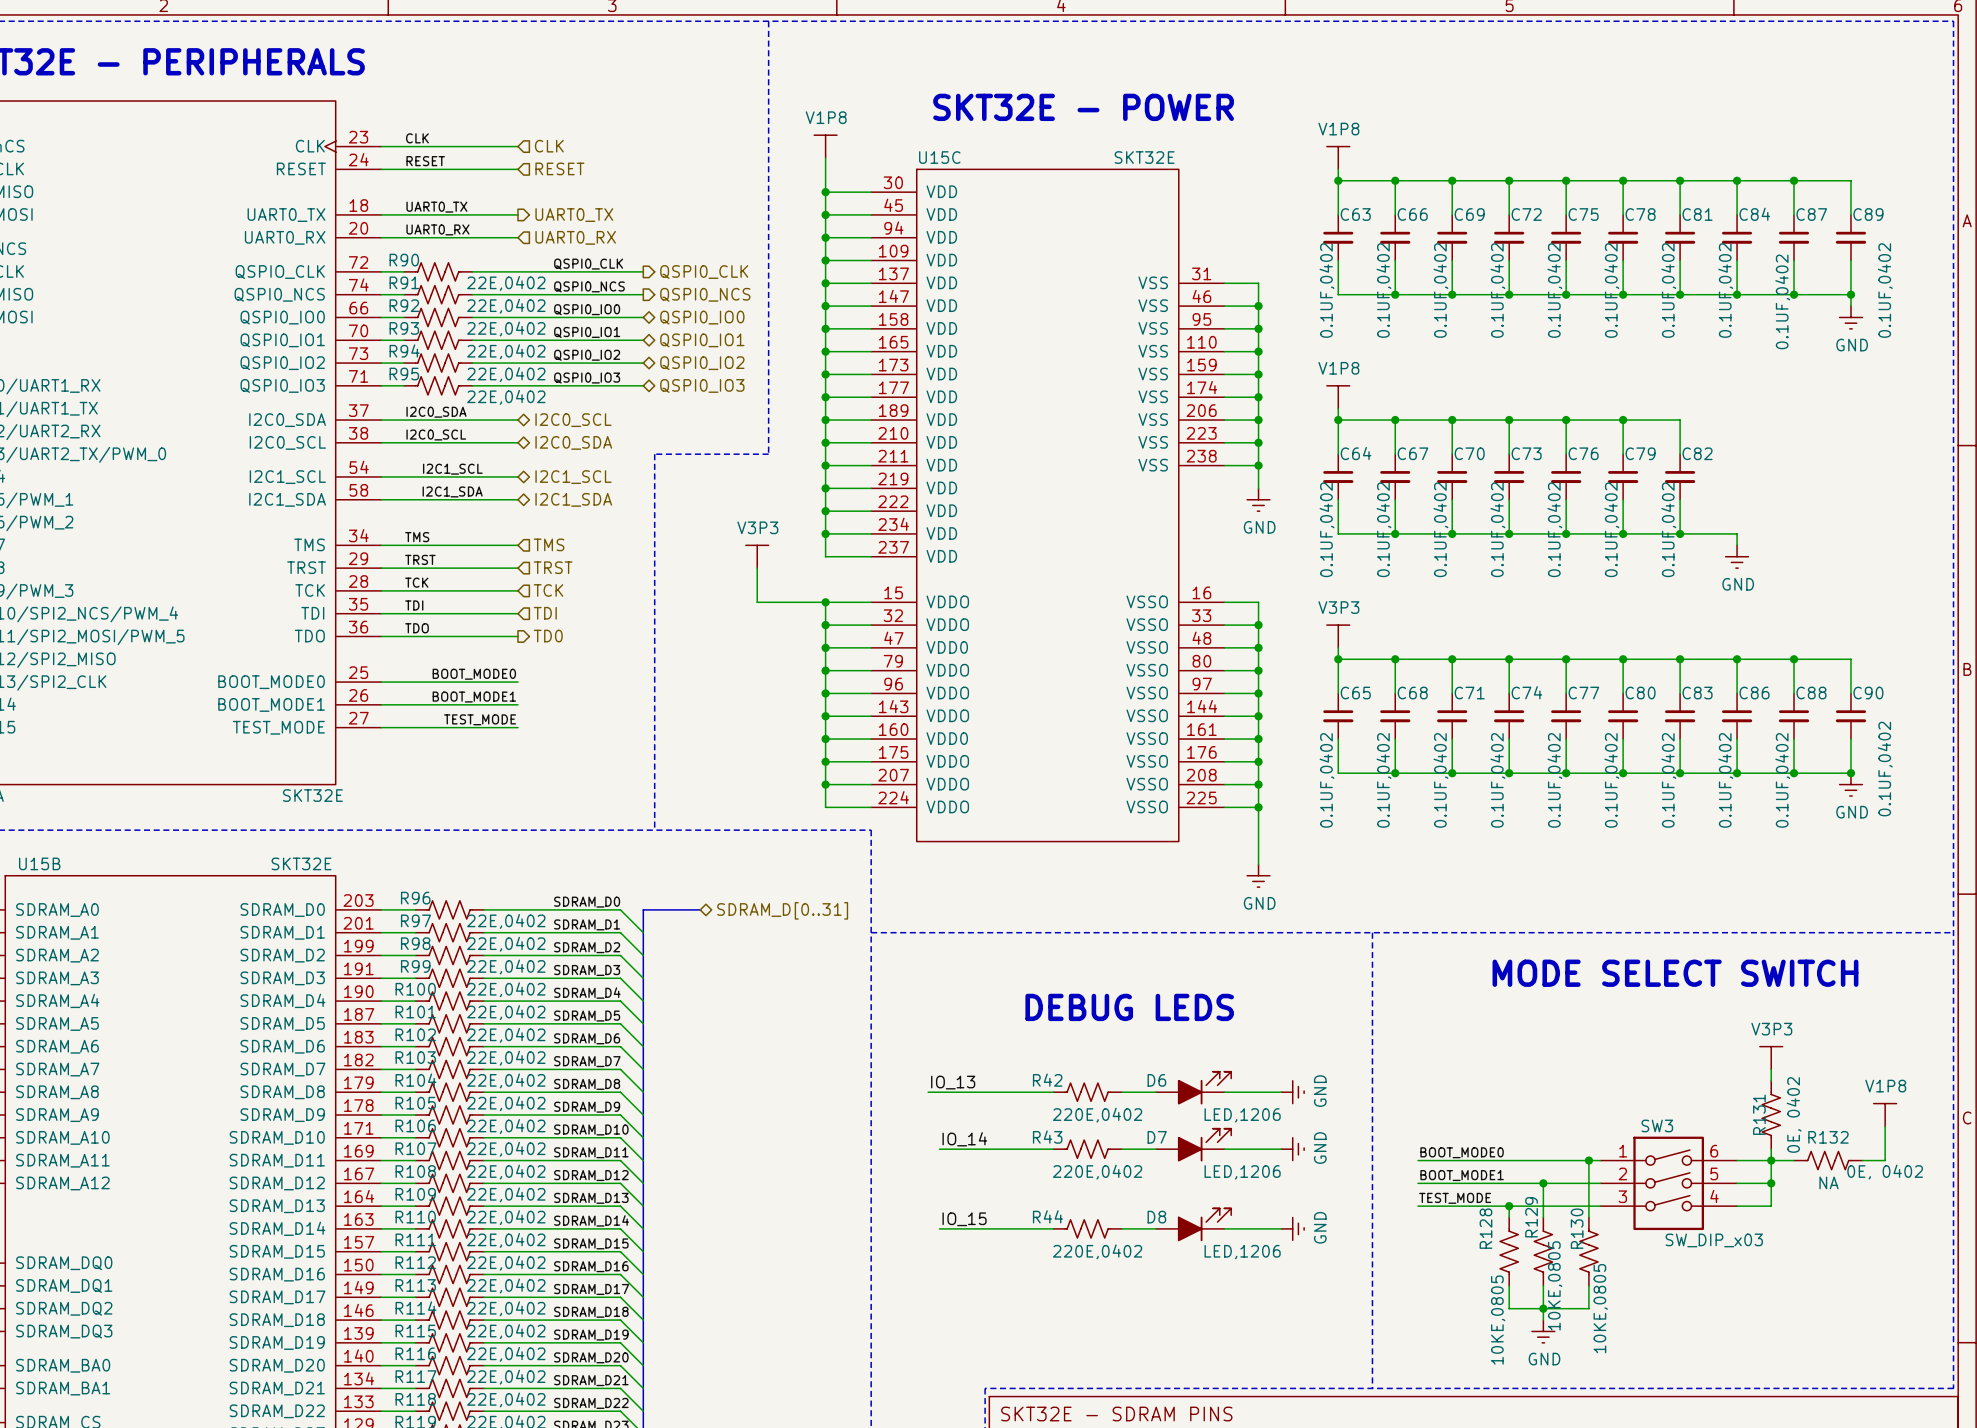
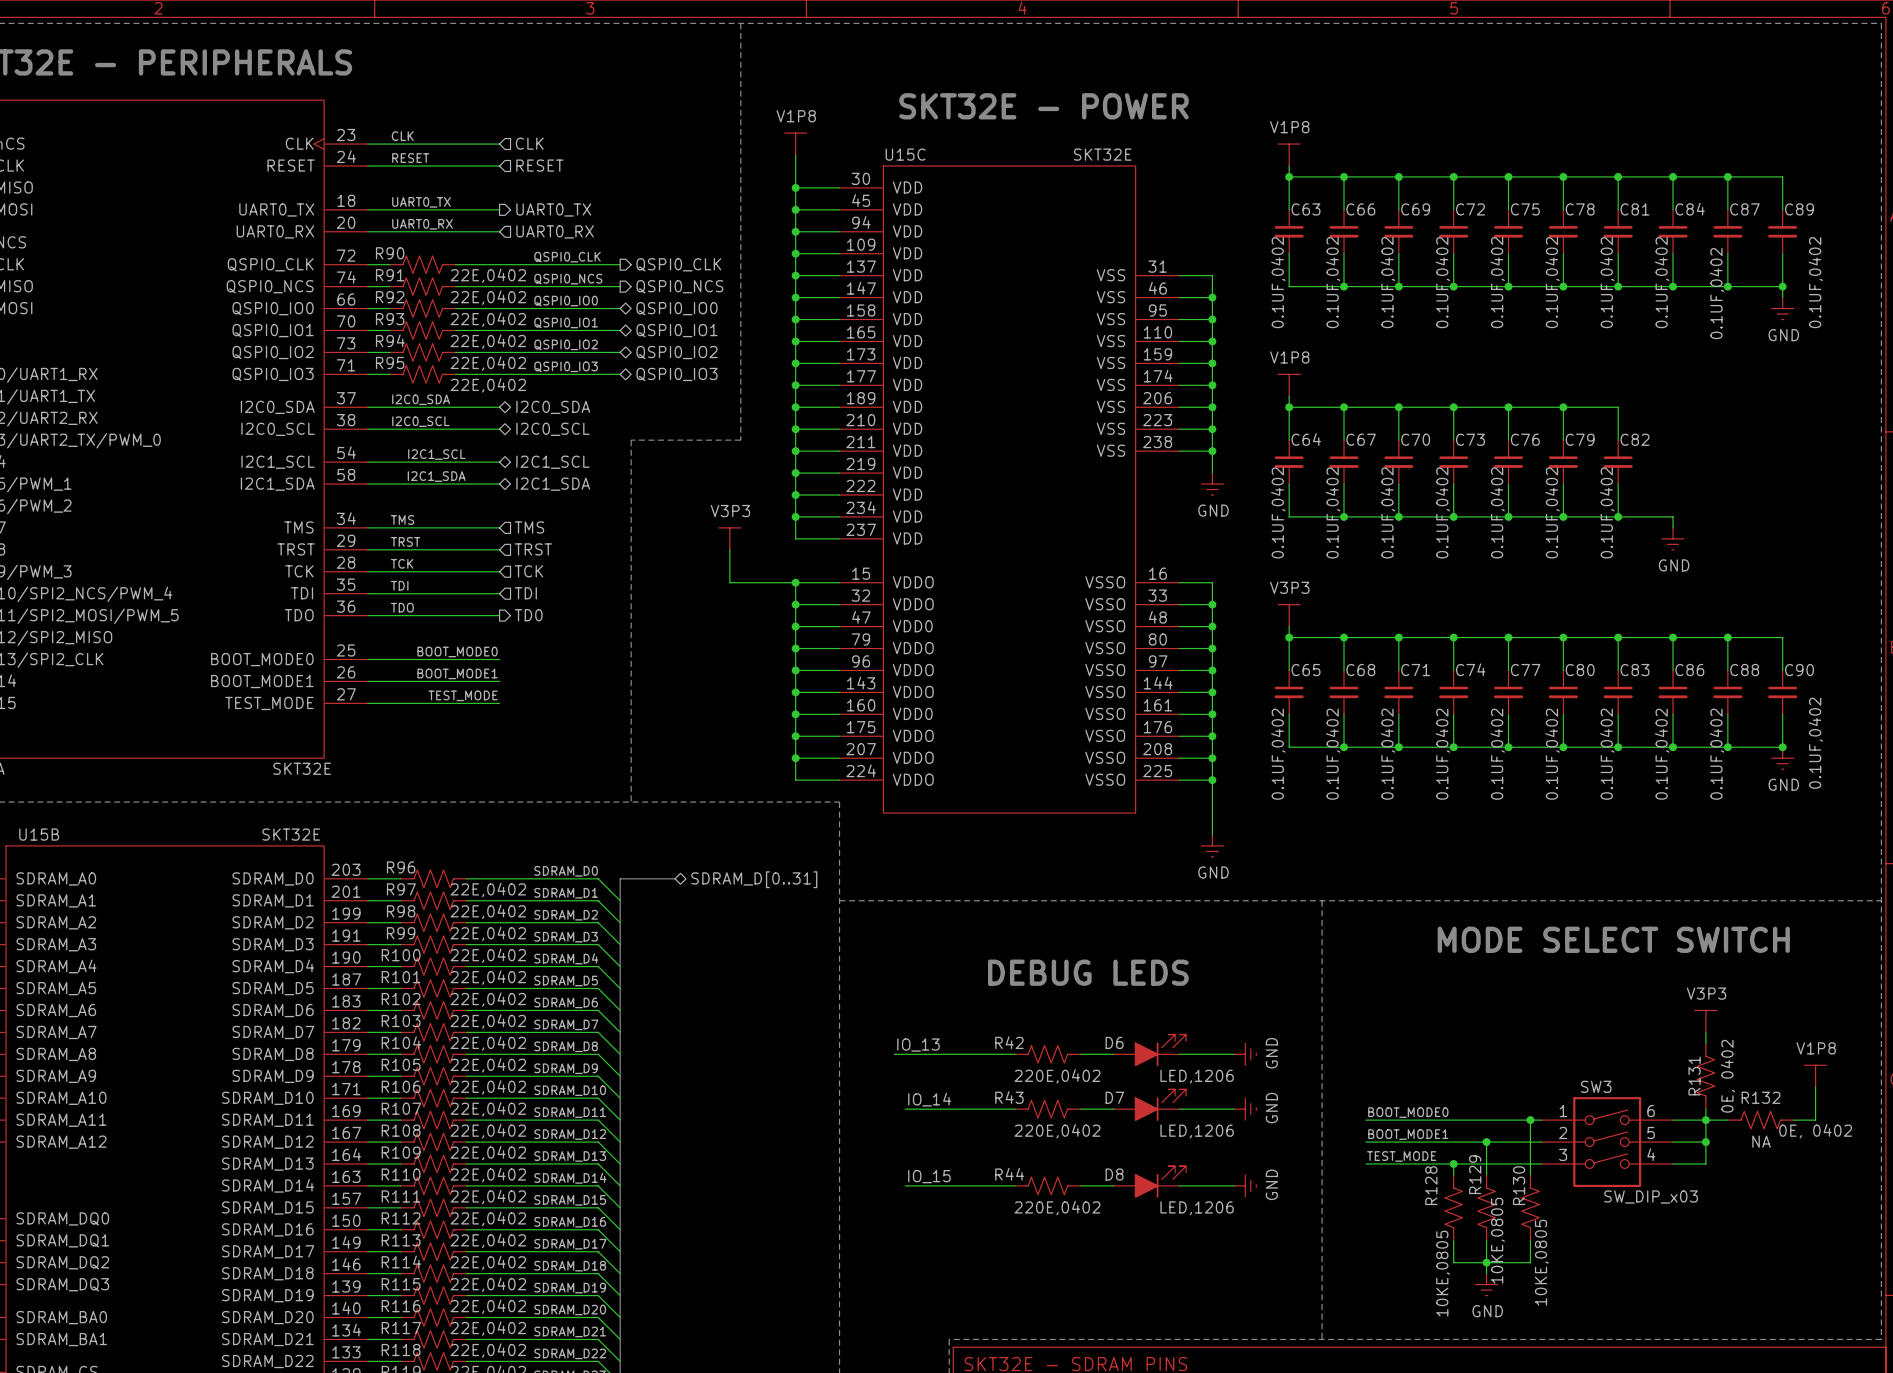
hierarchical label: I2C0_SCL (573, 420) -> I2C0_SDA (553, 407)
hierarchical label: I2C0_SDA (573, 442) -> I2C0_SCL (552, 429)

